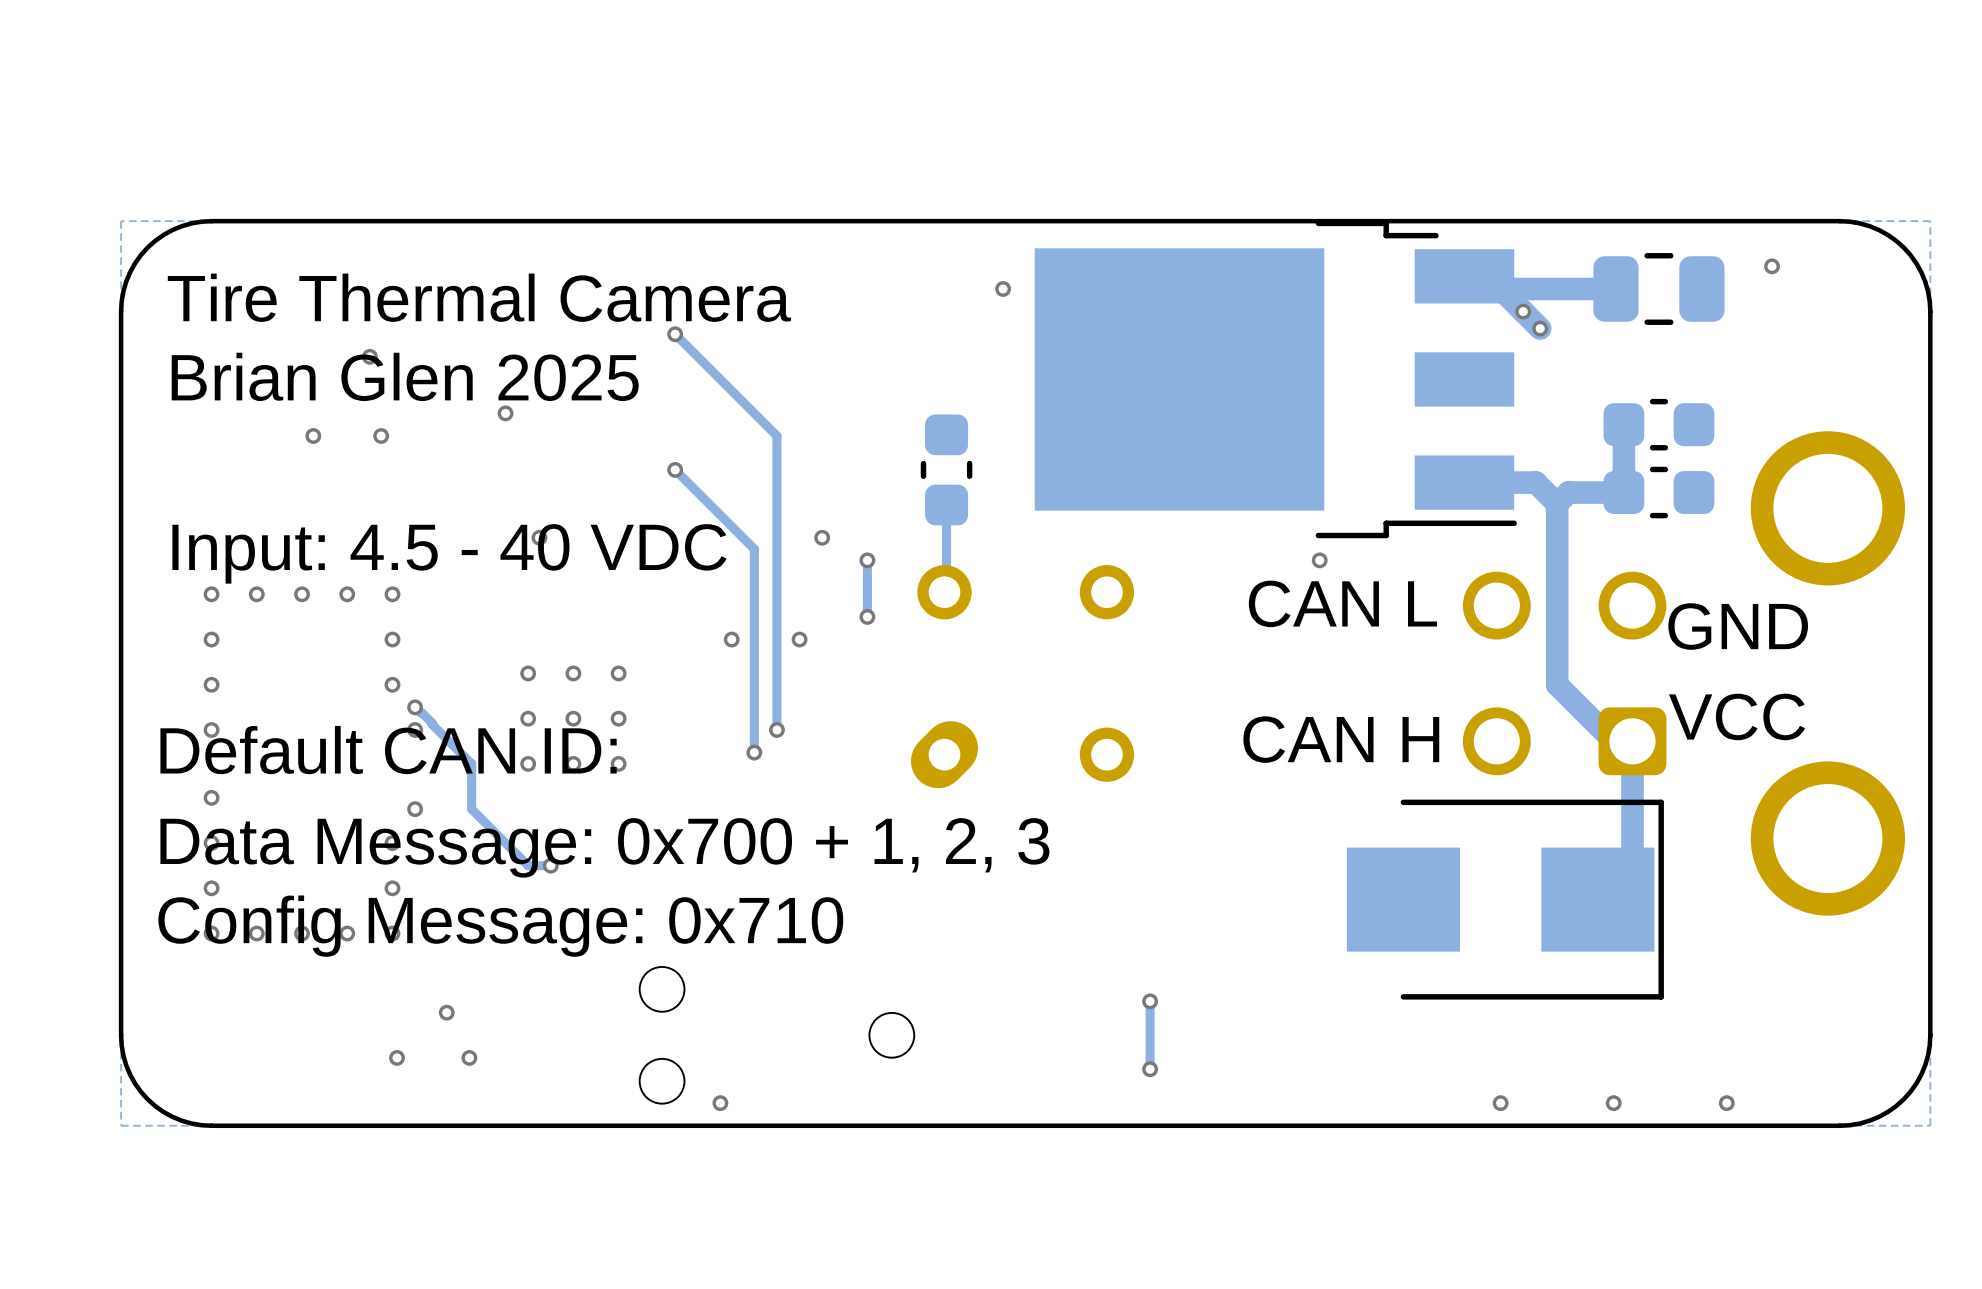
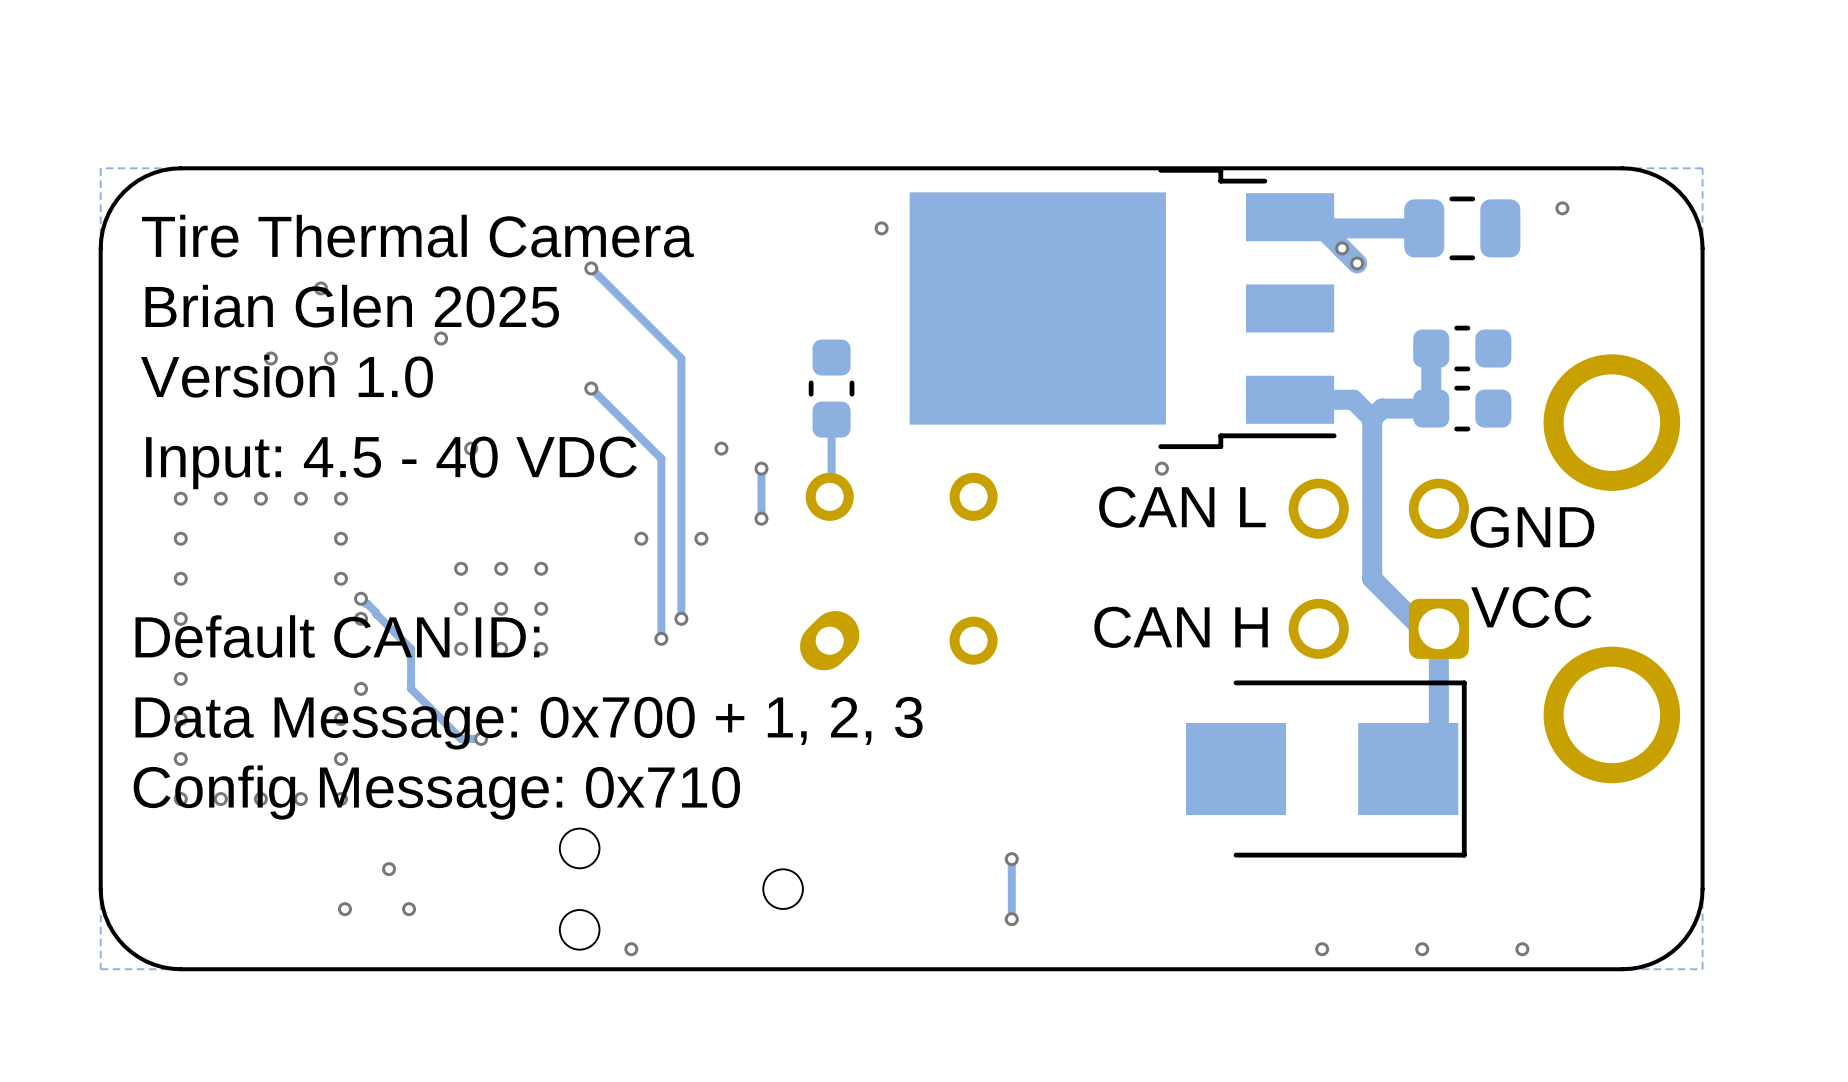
text: none -> Version 1.0 (286, 376)

